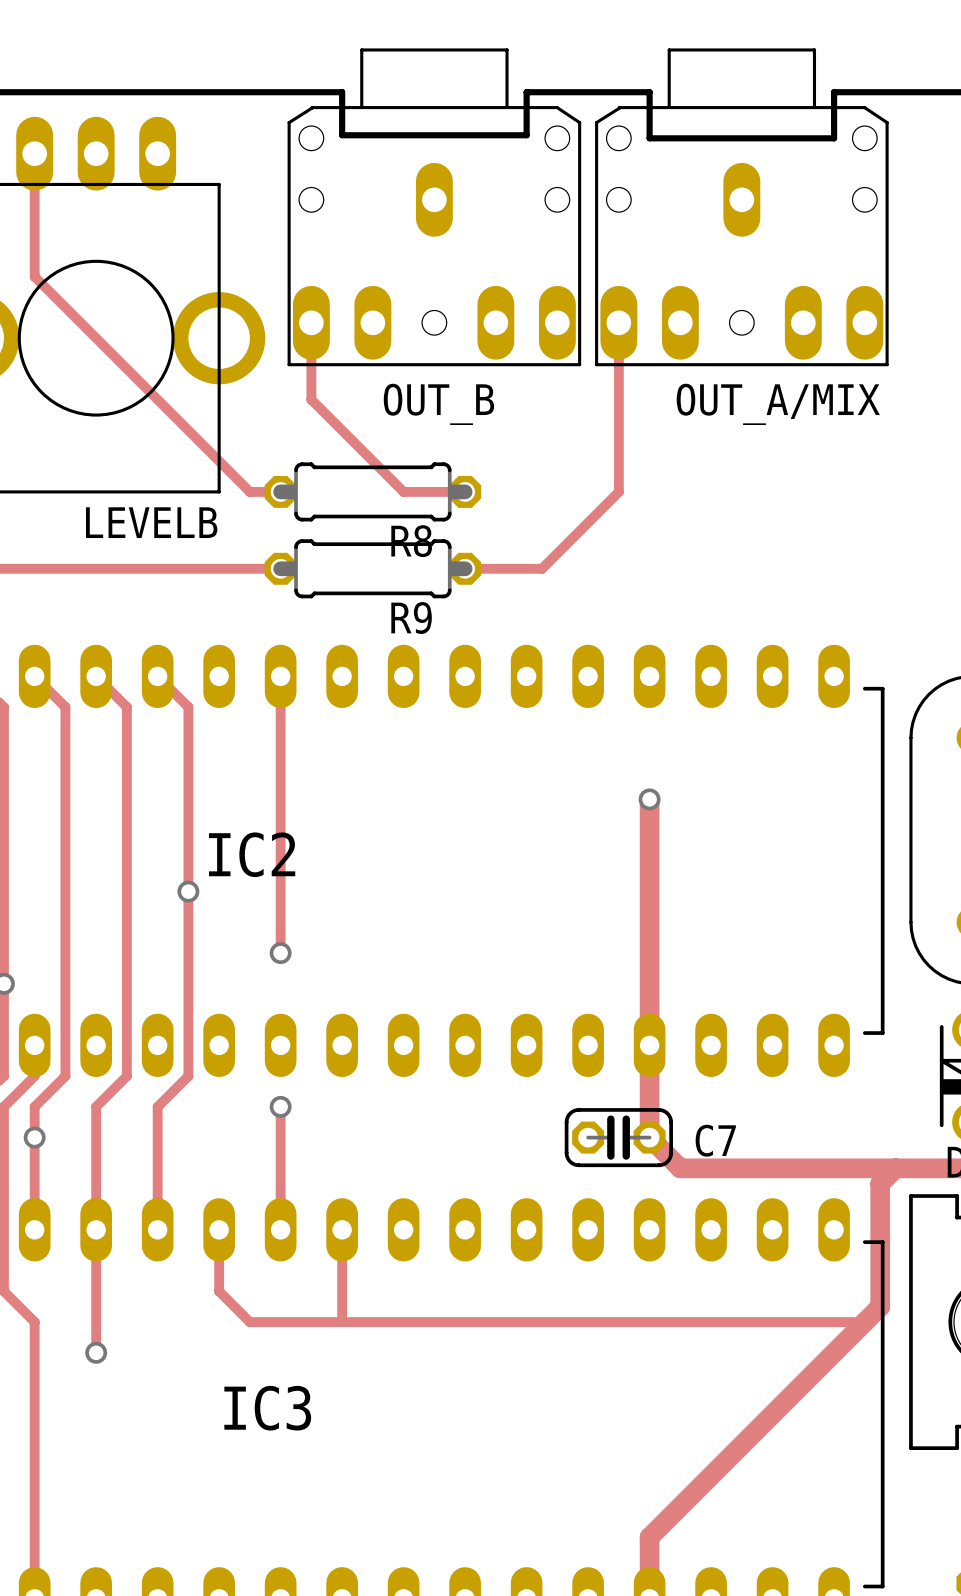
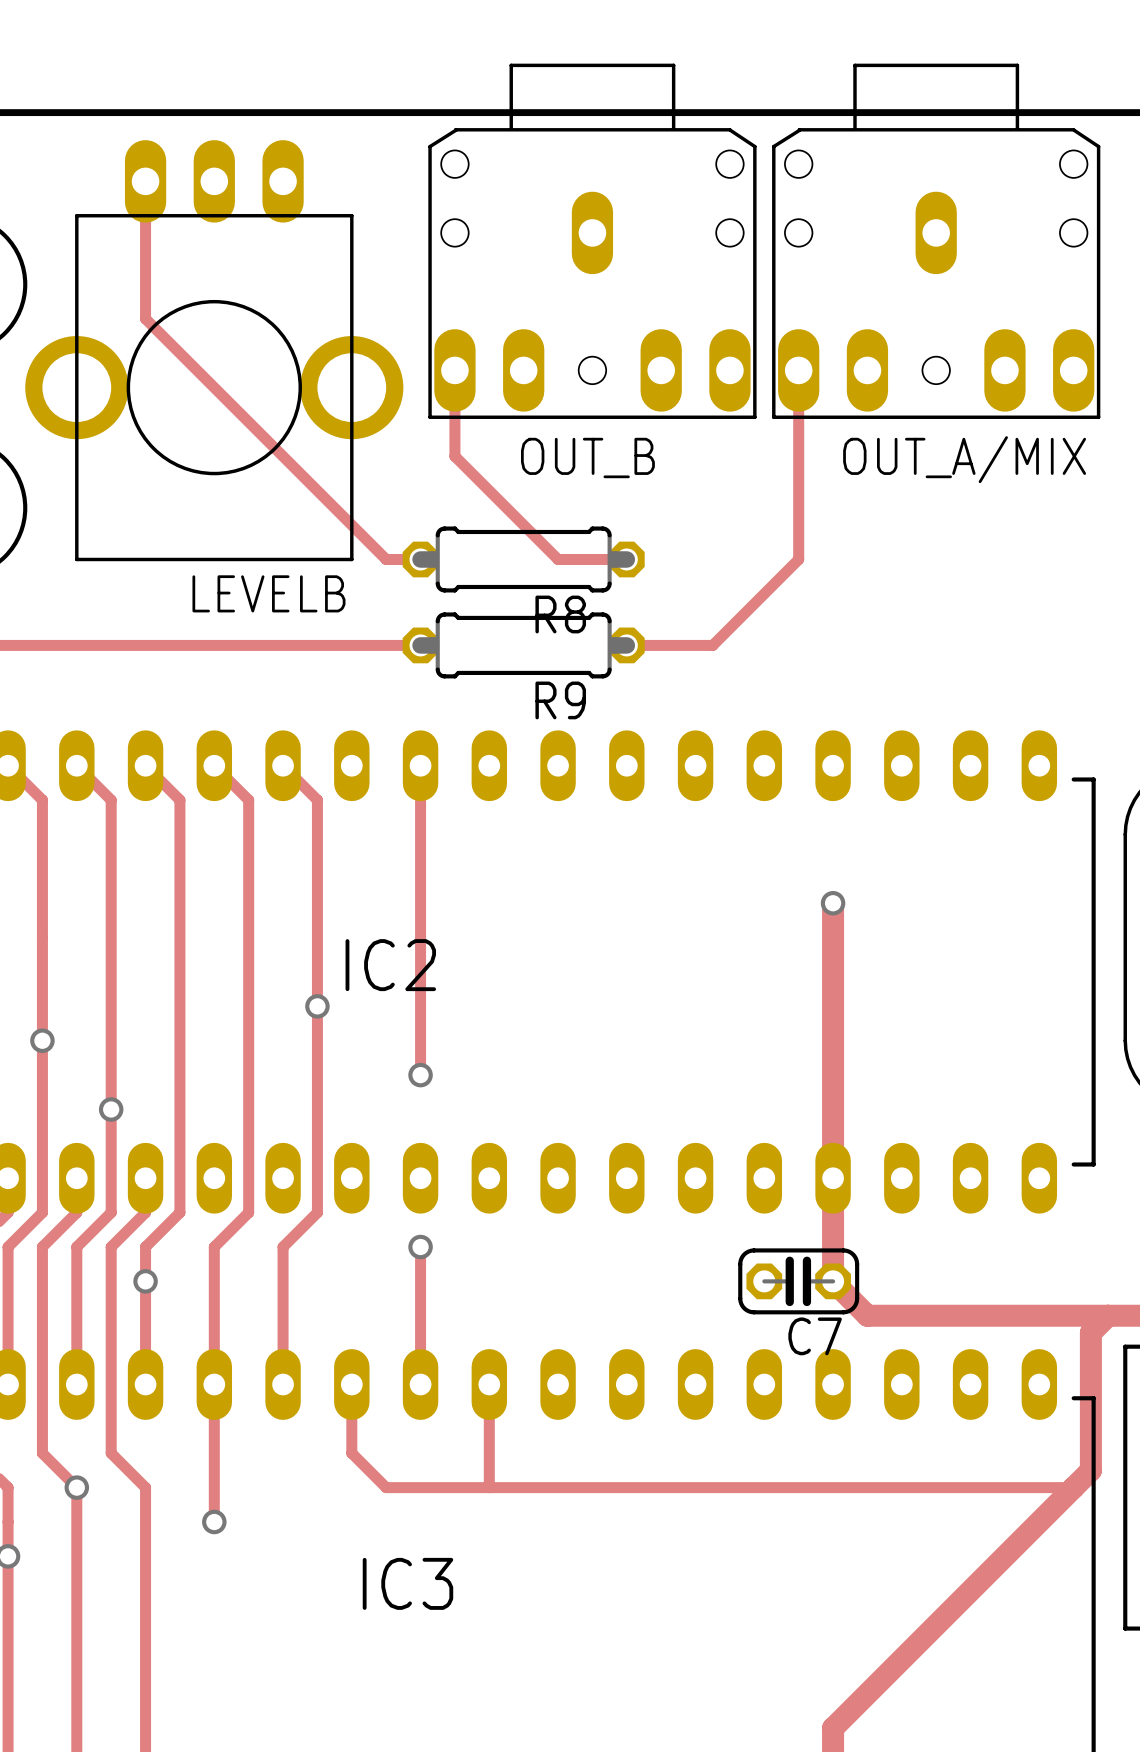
board edge: (342, 92) (342, 135) (526, 135) (526, 92) -> (489, 112) (695, 112)
board edge: (649, 92) (649, 138) (834, 138) (834, 92) -> (833, 112) (1039, 112)
C7 name position: C7 (715, 1140) -> C7 (815, 1336)

